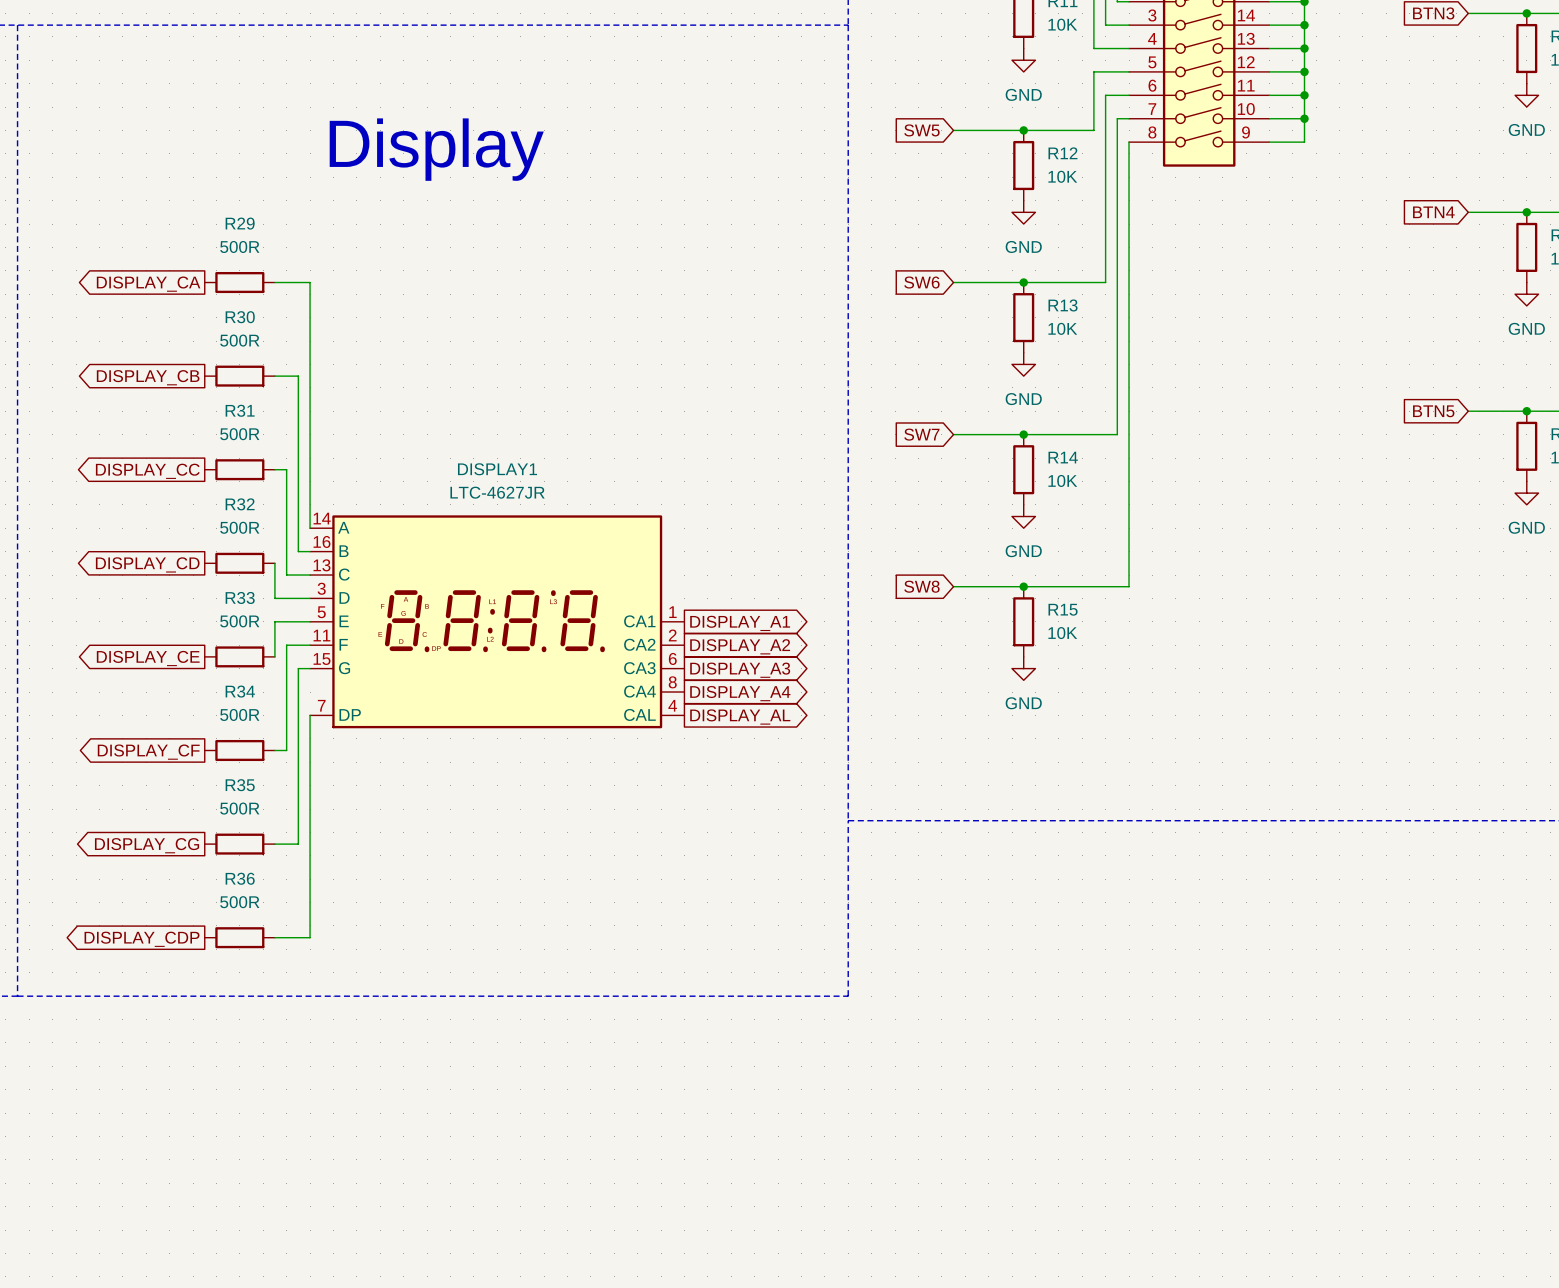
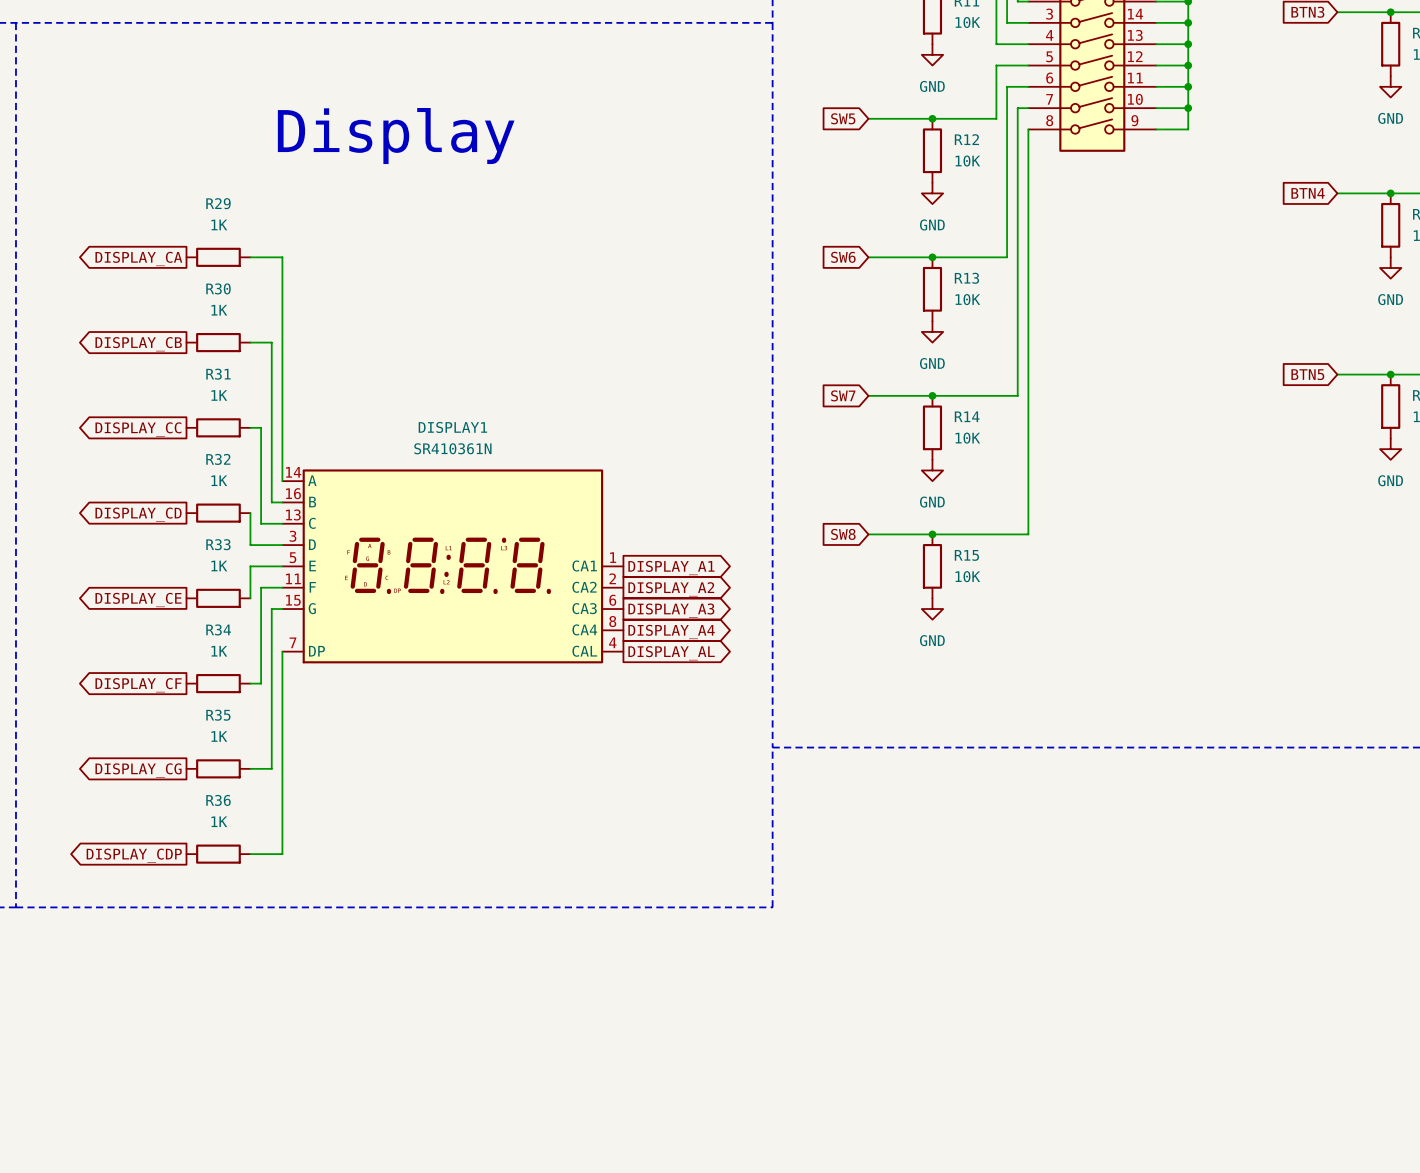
R29 value: 500R (239, 246) -> 1K (219, 224)
R30 value: 500R (239, 340) -> 1K (219, 310)
R31 value: 500R (239, 434) -> 1K (219, 395)
DISPLAY1 value: LTC-4627JR (497, 492) -> SR410361N (452, 448)
R32 value: 500R (239, 527) -> 1K (219, 480)
R33 value: 500R (239, 621) -> 1K (219, 565)
R34 value: 500R (239, 714) -> 1K (219, 651)
R35 value: 500R (239, 808) -> 1K (219, 736)
R36 value: 500R (239, 902) -> 1K (219, 821)

